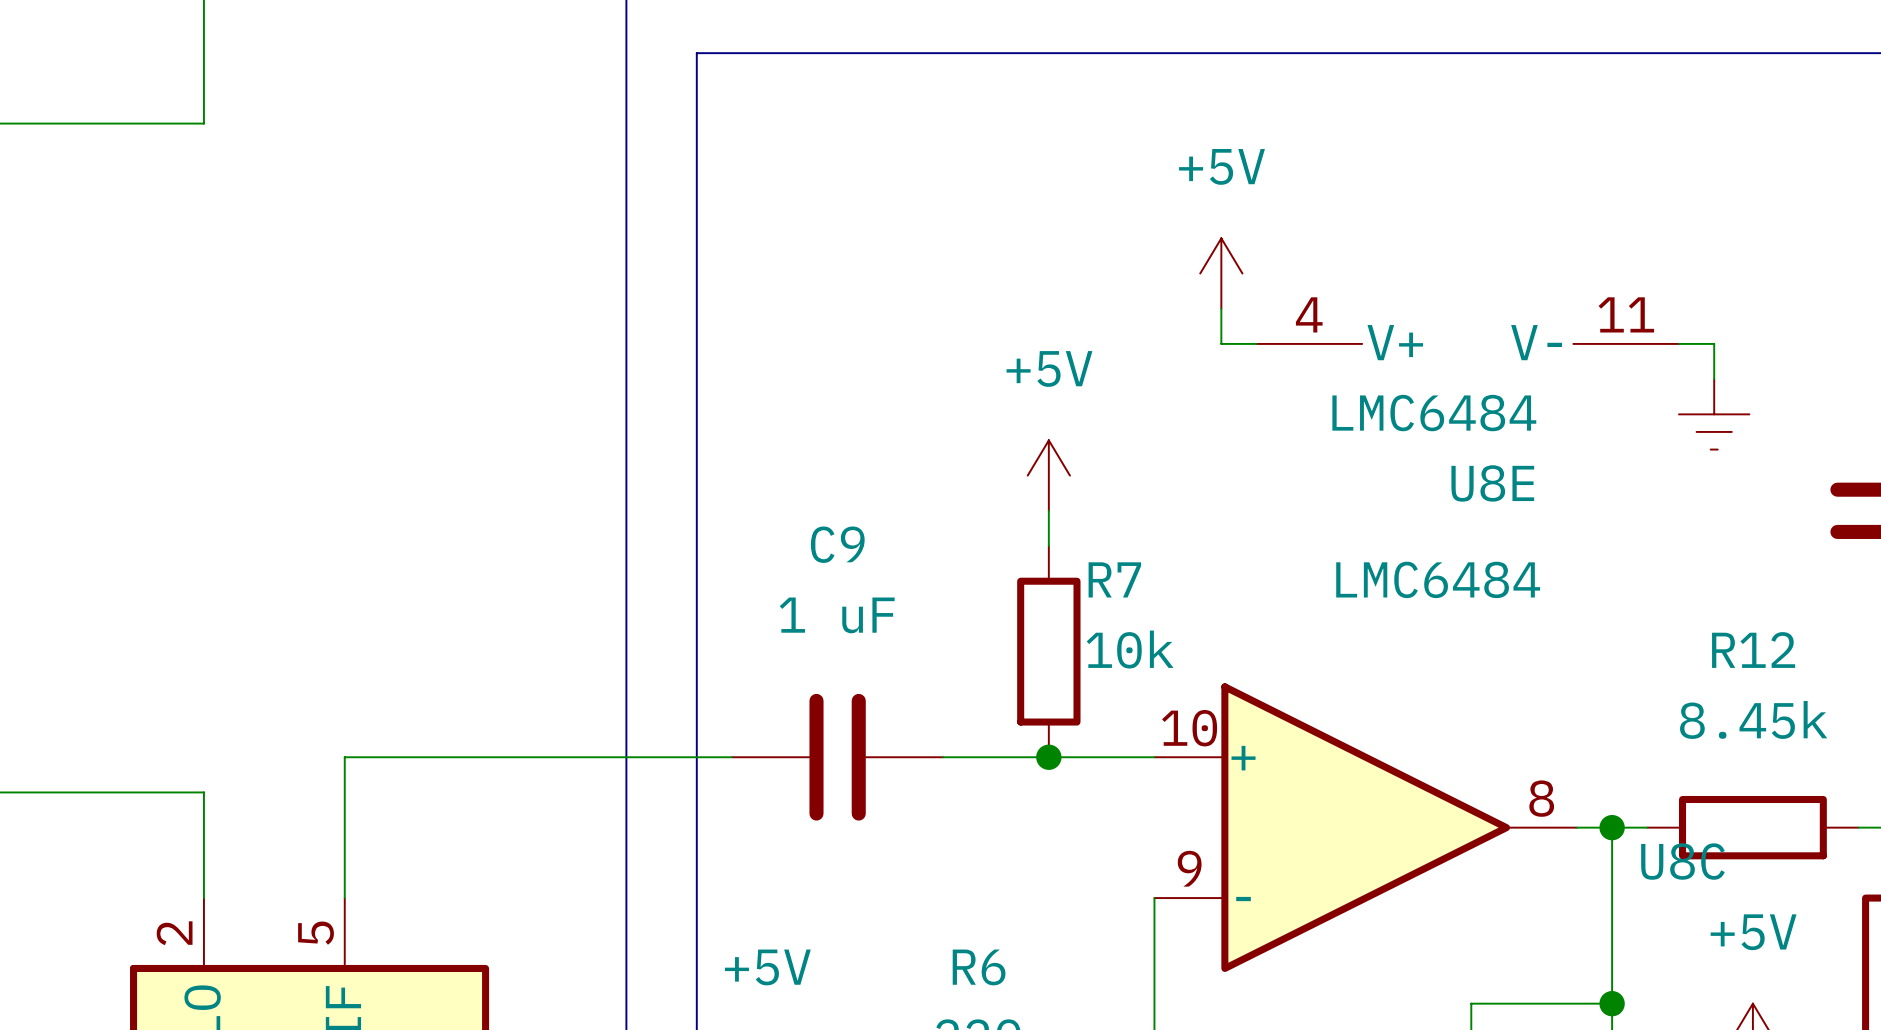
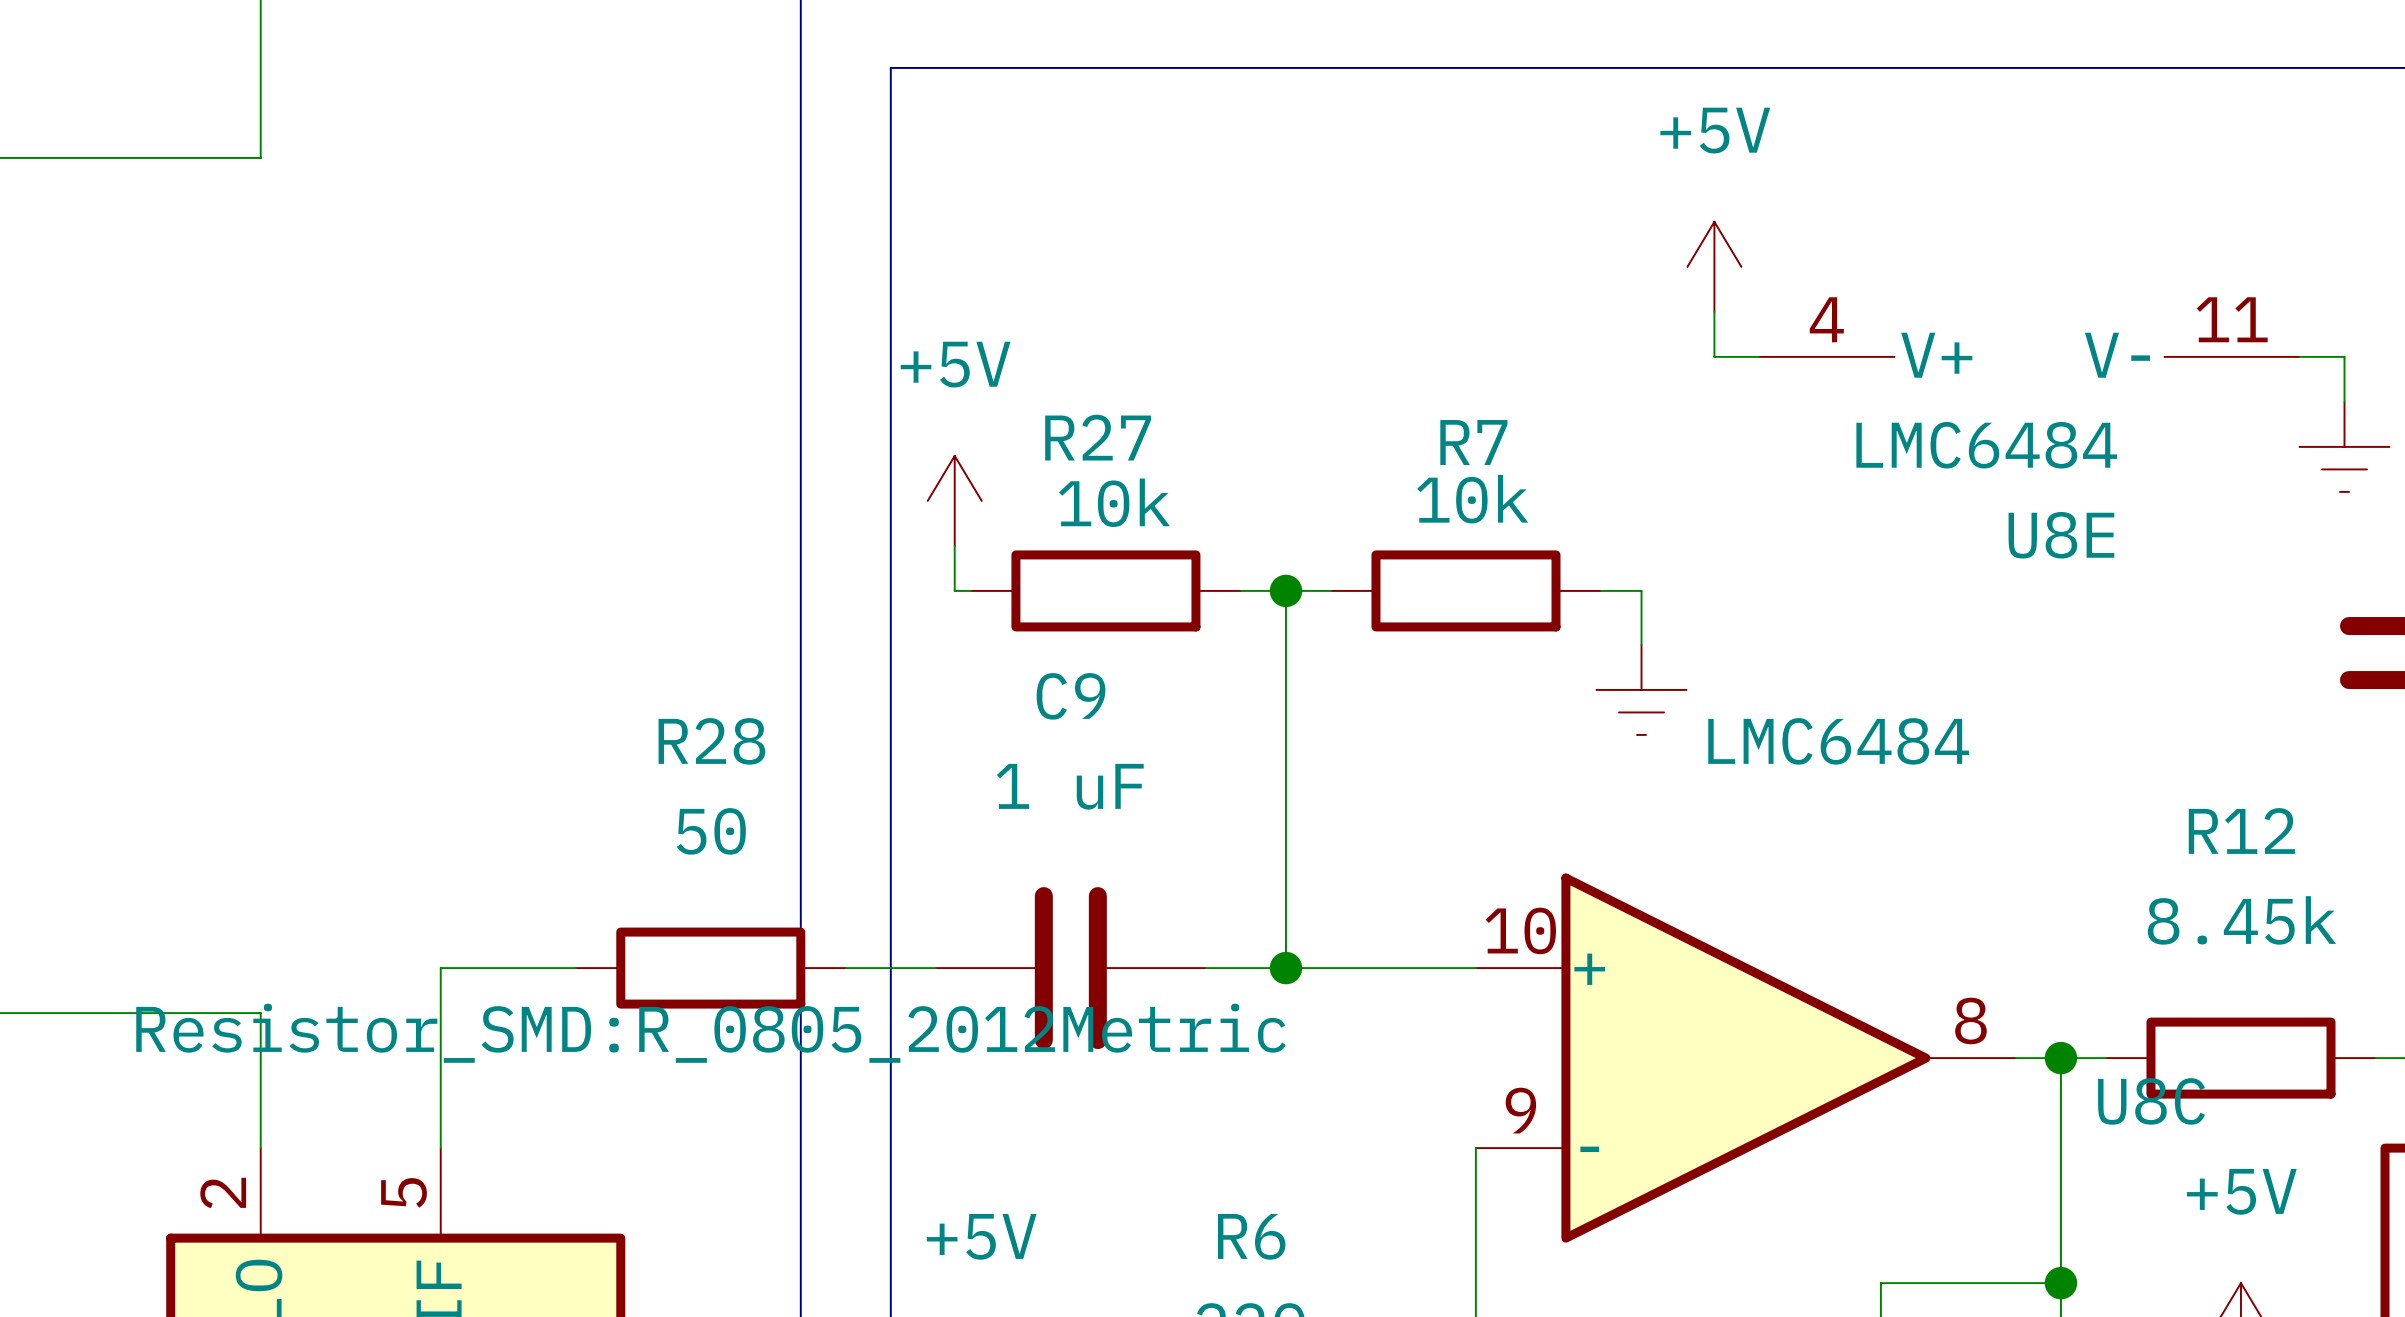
power symbol position: +5V (1221, 273) -> +5V (1714, 266)
wire: (1221, 308) (1221, 343) (1256, 343) -> (1714, 311) (1714, 356) (1759, 356)
U8E position: (1467, 343) -> (2029, 356)
wire: (1678, 343) (1714, 343) (1714, 379) -> (2299, 356) (2344, 356) (2344, 401)
power symbol: none -> +5V (954, 500)
power symbol position: (1714, 414) -> (2344, 446)
wire: none -> (954, 545) (954, 590) (970, 590)
R27: none -> 10k (1105, 590)
wire: none -> (1240, 590) (1330, 590)
wire: none -> (1285, 590) (1285, 968)
junction: none -> (1285, 590)
wire: none -> (1601, 590) (1641, 590) (1641, 644)
power symbol: +5V (1048, 475) -> none
wire: (1048, 510) (1048, 546) -> none
power symbol: none -> (1641, 689)
R7 name position: R7 (1114, 579) -> R7 (1473, 442)
R7 value position: 10k (1130, 649) -> 10k (1472, 499)
R7 rotation: 0° (1048, 651) -> 90° clockwise (1465, 590)
R7 position: (1048, 651) -> (1465, 590)
wire: (450, 757) (661, 757) -> none
R28: none -> 50 (710, 968)
junction position: (1048, 757) -> (1285, 968)

